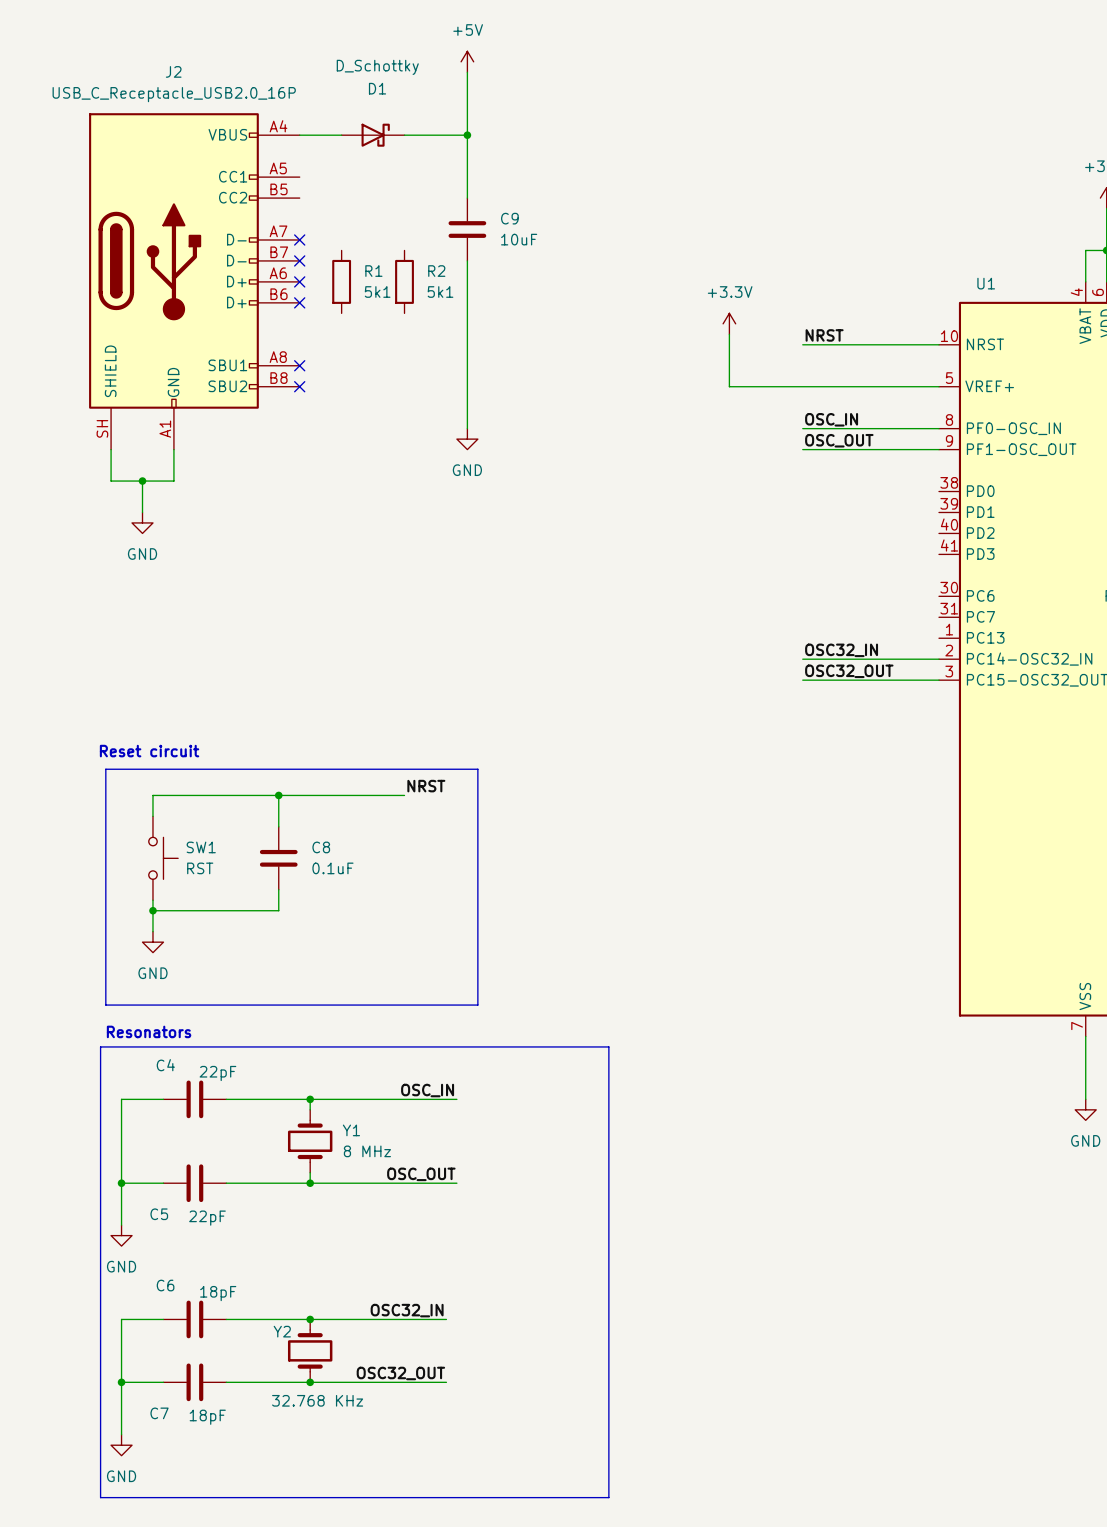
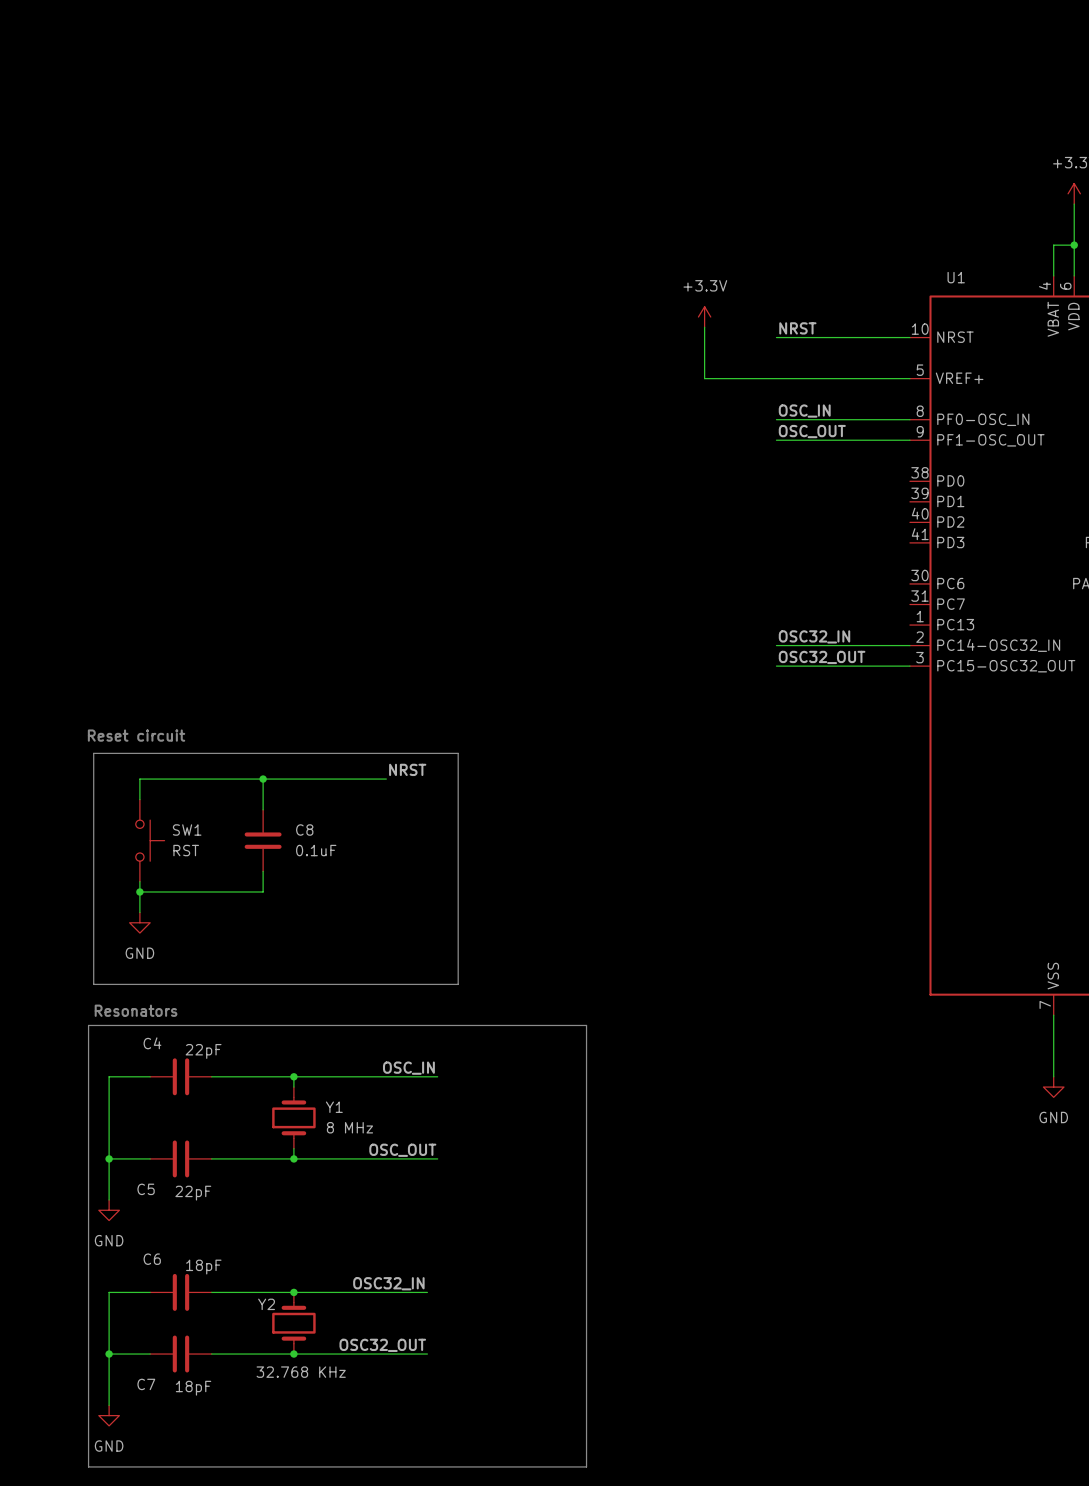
power symbol: +5V (467, 61) -> none
wire: (467, 72) (467, 198) -> none
wire: (299, 135) (341, 135) -> none
D1: D_Schottky (373, 135) -> none
wire: (404, 135) (467, 135) -> none
junction: (467, 135) -> none
C9: 10uF (467, 229) -> none
no-connect mark: (299, 239) -> none
no-connect mark: (299, 260) -> none
wire: (467, 260) (467, 428) -> none
J2: USB_C_Receptacle_USB2.0_16P (194, 281) -> none
no-connect mark: (299, 281) -> none
R1: 5k1 (341, 281) -> none
R2: 5k1 (404, 281) -> none
no-connect mark: (299, 302) -> none
no-connect mark: (299, 365) -> none
no-connect mark: (299, 386) -> none
power symbol: GND (467, 439) -> none
wire: (111, 449) (111, 481) (173, 481) (173, 449) -> none
wire: (142, 481) (142, 512) -> none
junction: (142, 481) -> none
power symbol: GND (142, 522) -> none

